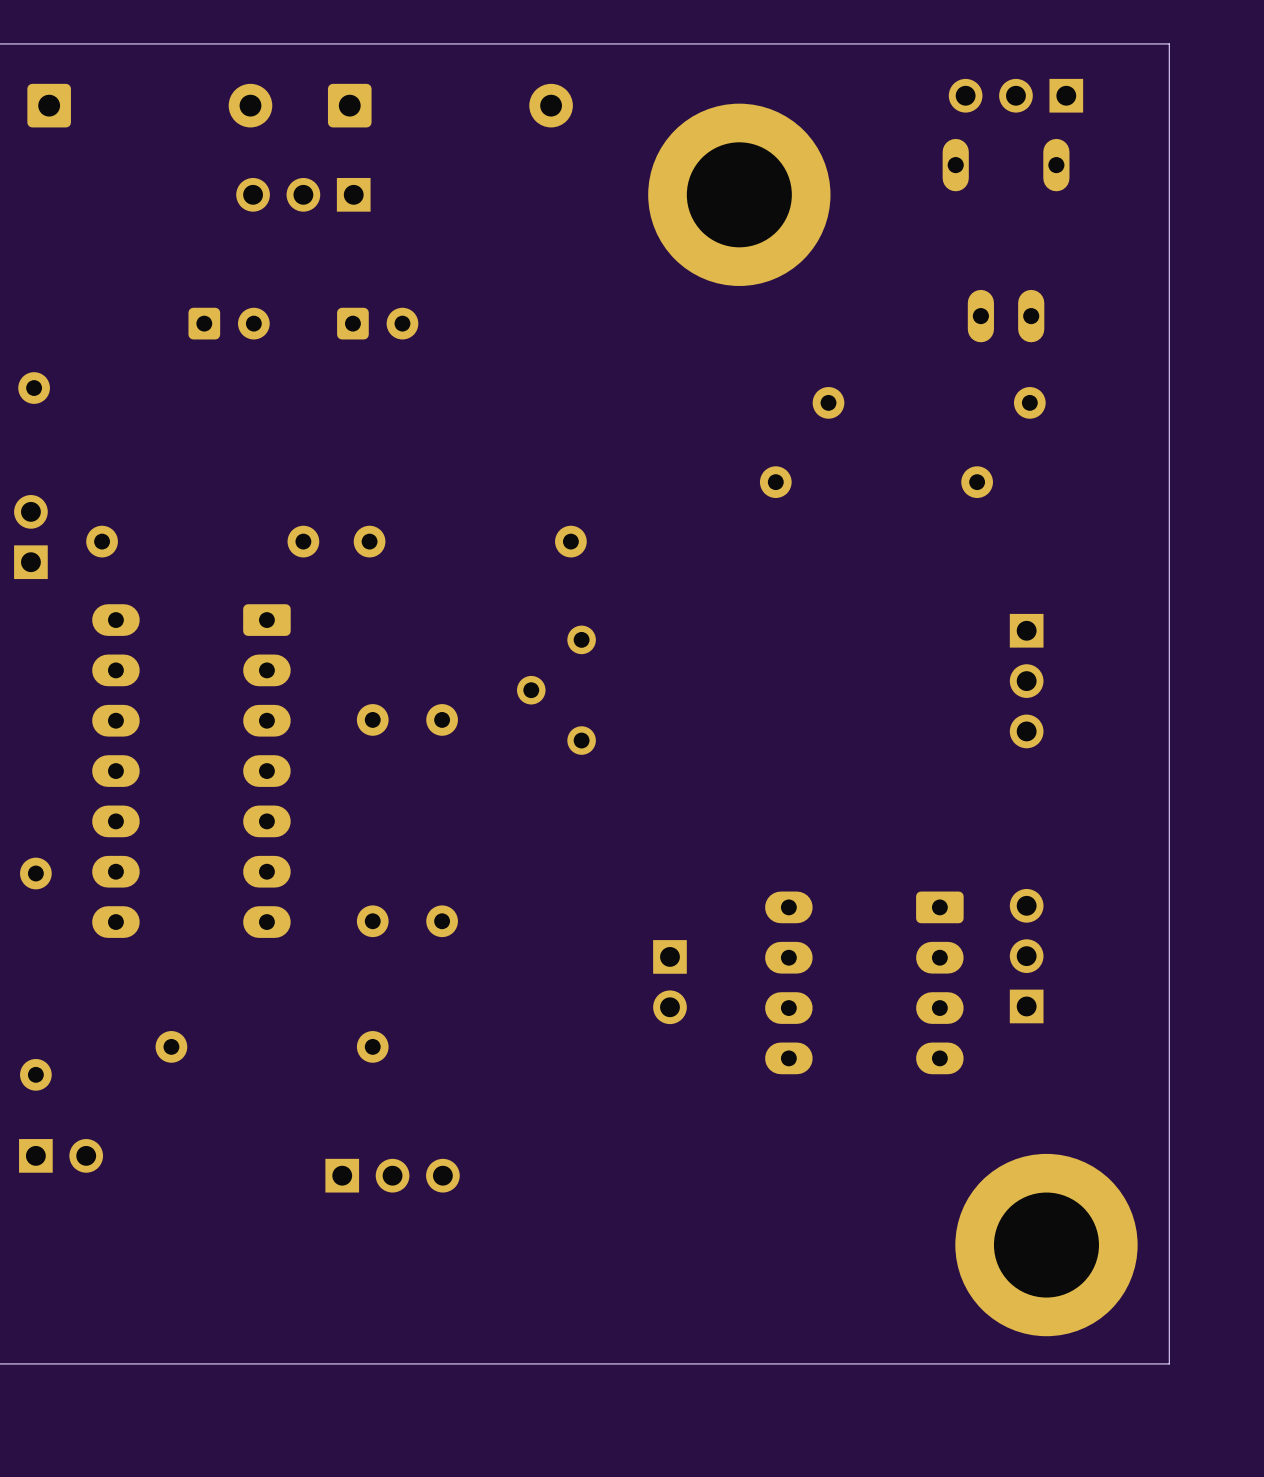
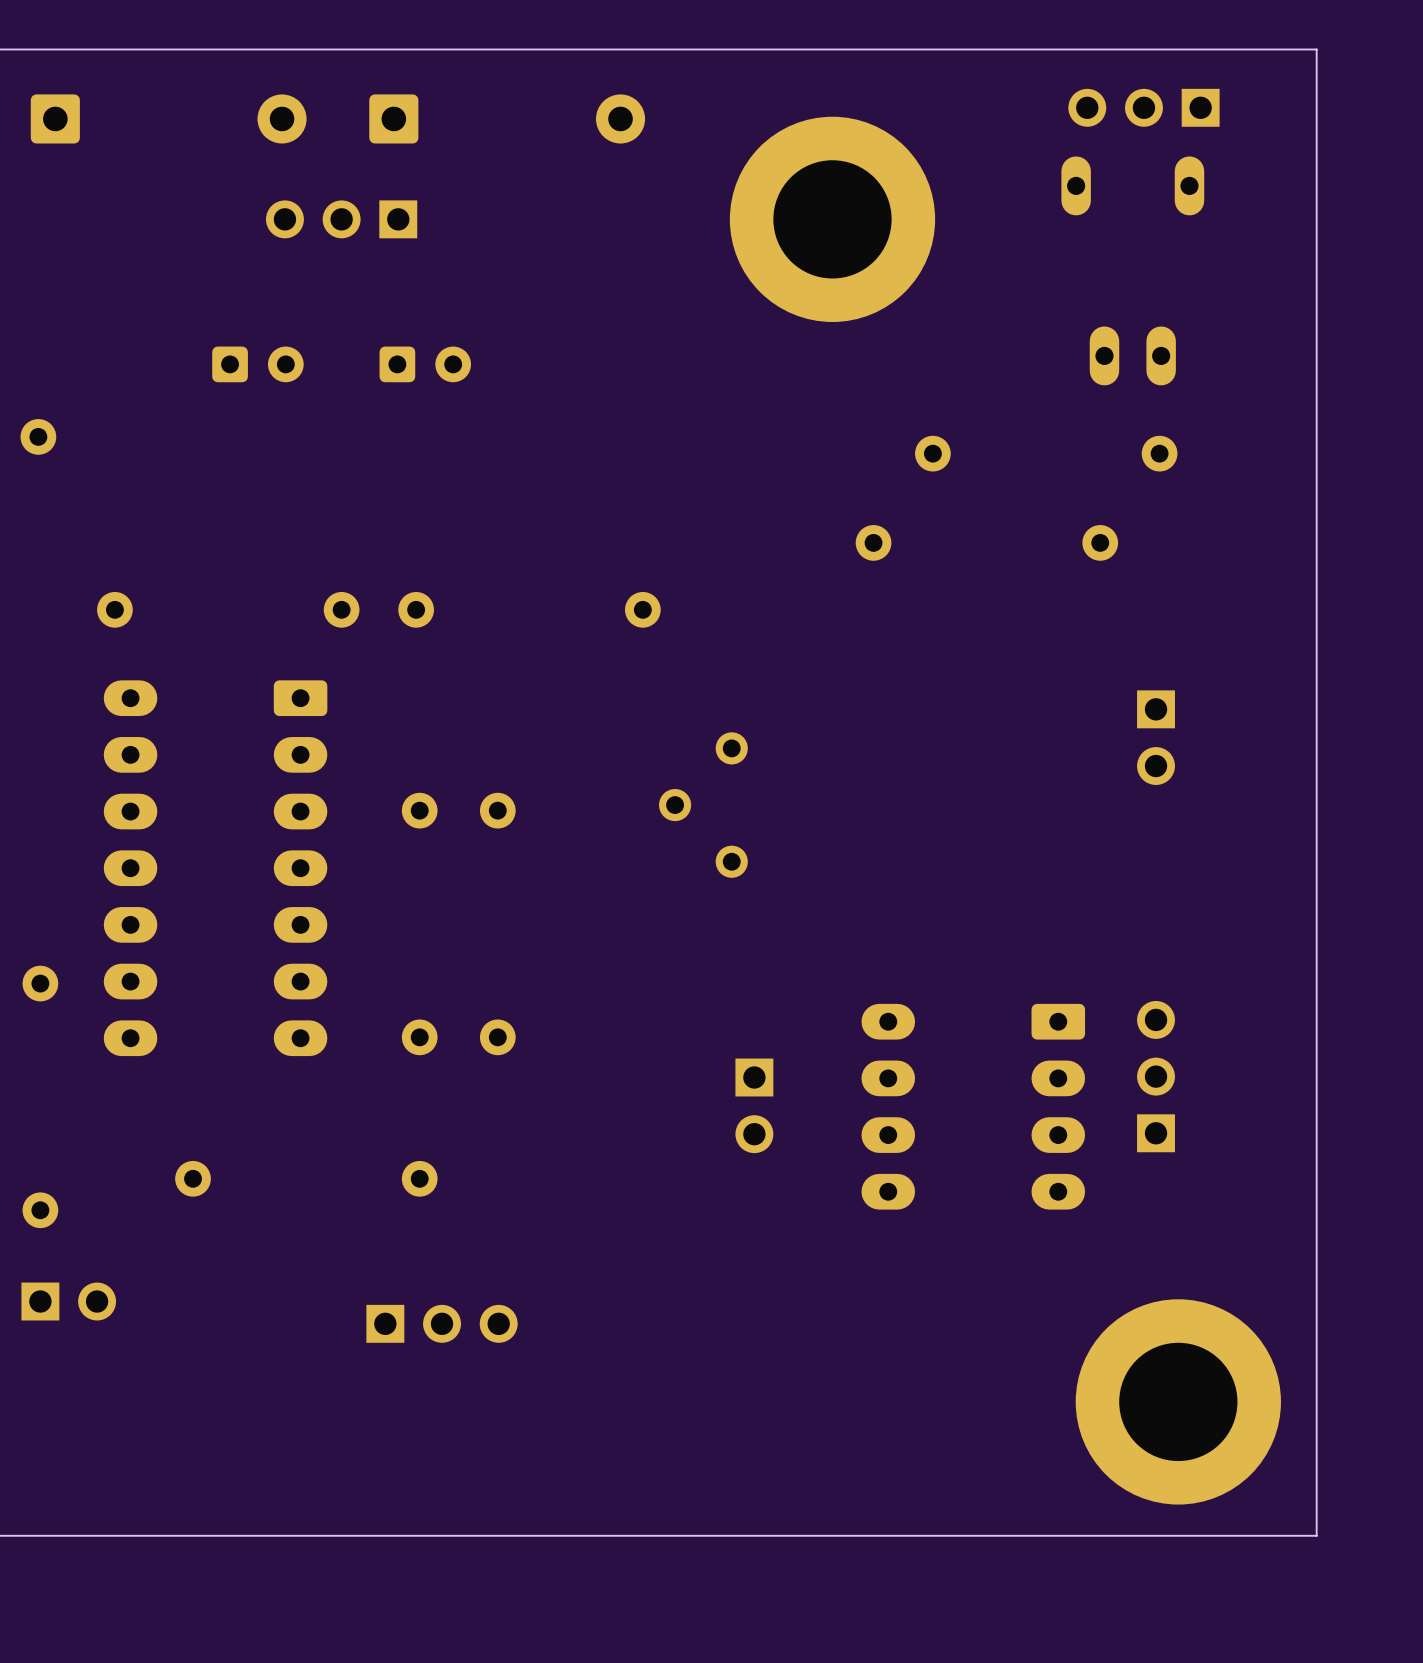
part: (30, 537) -> none
part: none -> (1156, 737)
part: (1026, 681) -> none
part position: (556, 690) -> (703, 805)

